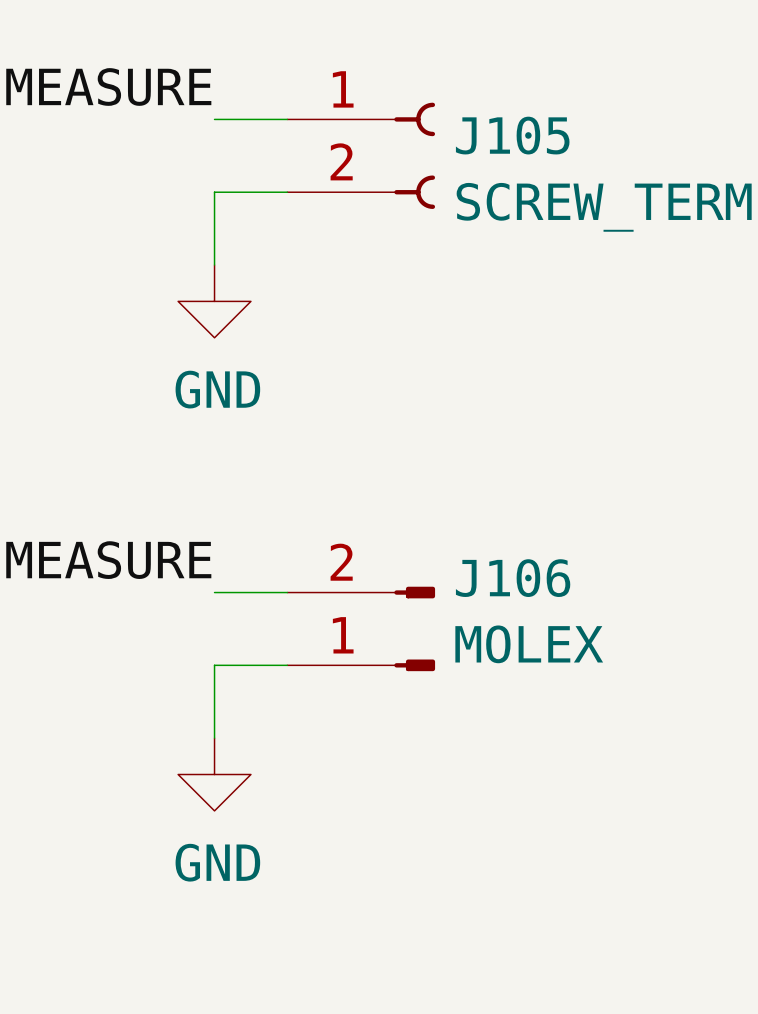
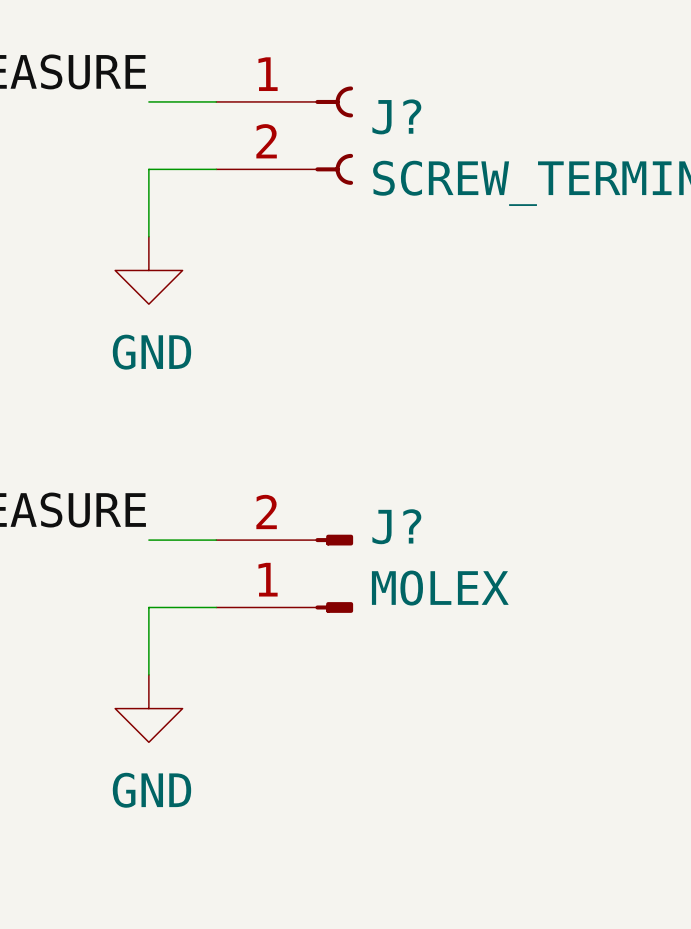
J105 name: J105 (512, 135) -> J? (396, 116)
J106 name: J106 (513, 578) -> J? (396, 526)

